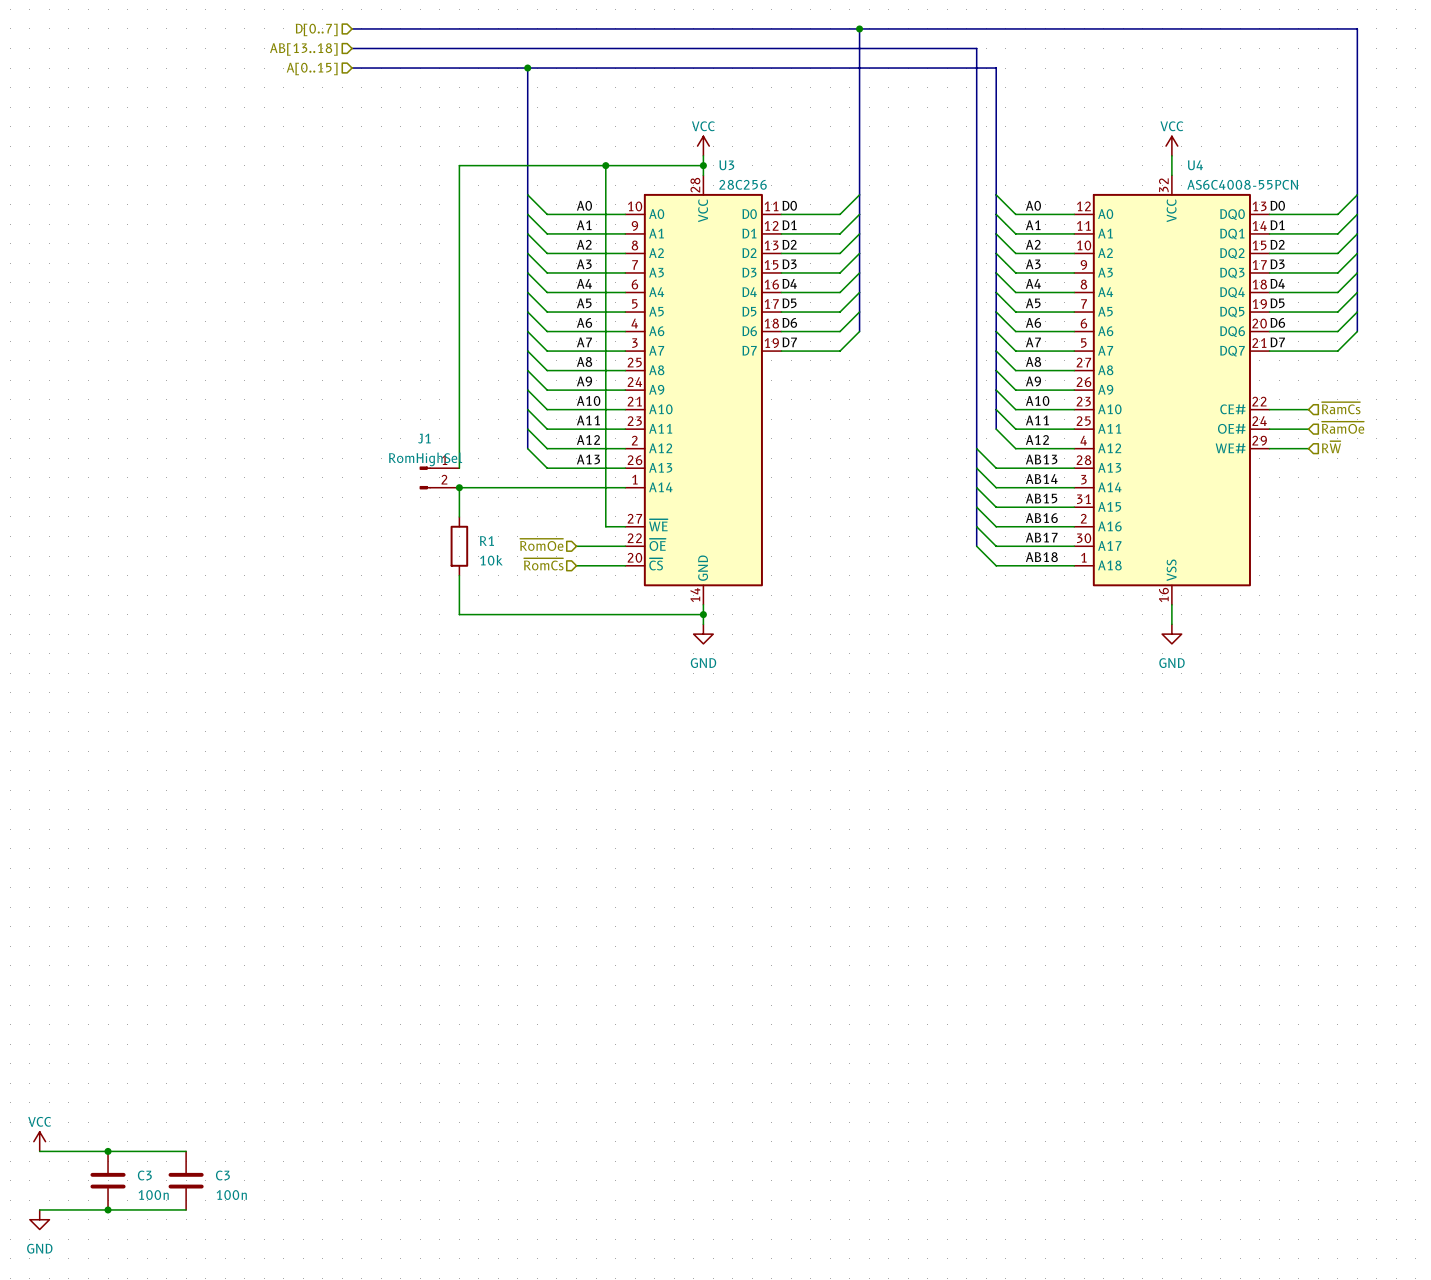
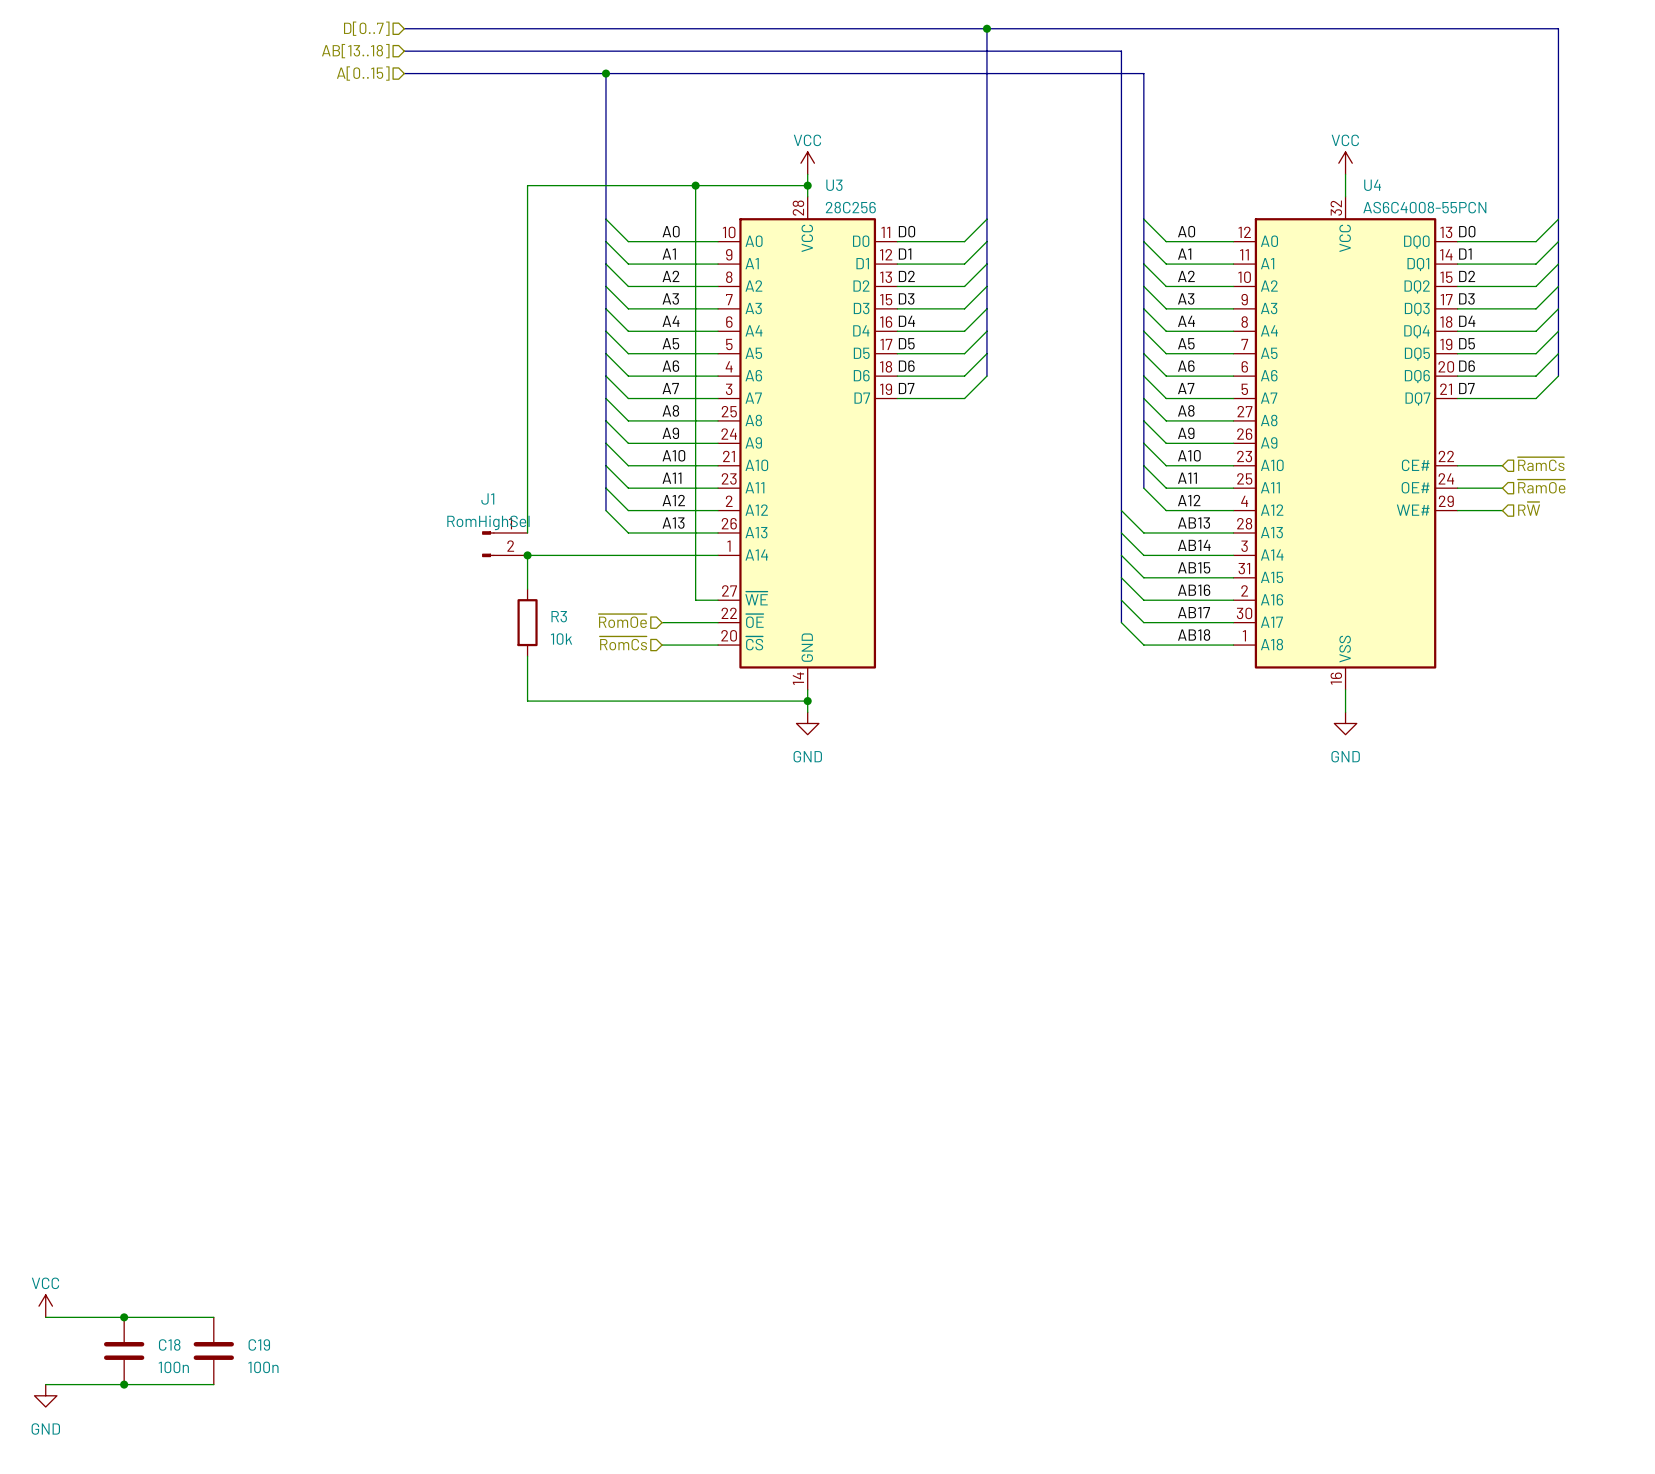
R1 name: R1 (486, 541) -> R3 (559, 616)
C3 name: C3 (144, 1175) -> C18 (169, 1344)
C3 name: C3 (222, 1175) -> C19 (259, 1344)

